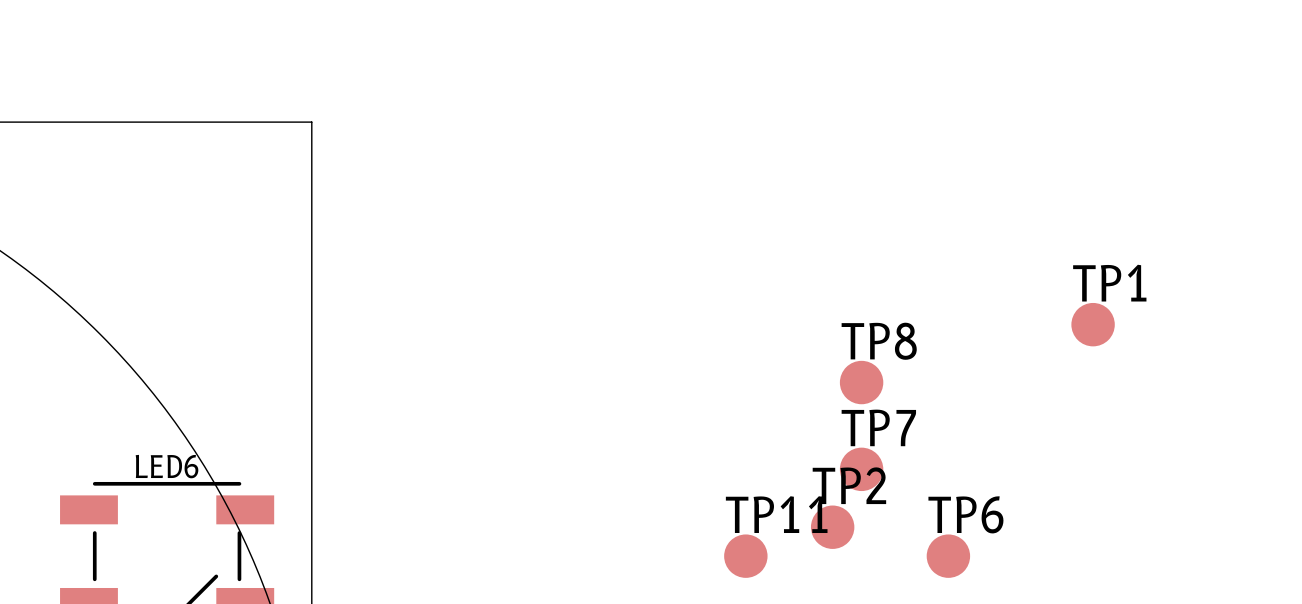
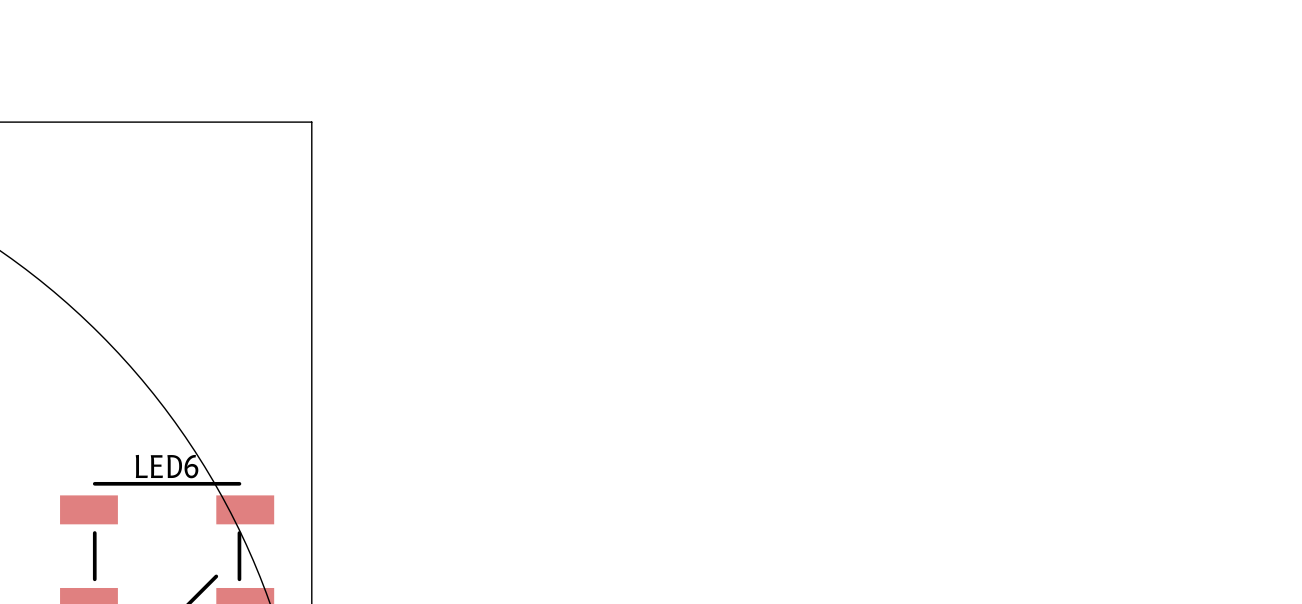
TP1: (1093, 324) -> none
TP8: (861, 382) -> none
TP7: (861, 469) -> none
TP2: (832, 527) -> none
TP11: (745, 556) -> none
TP6: (948, 556) -> none

